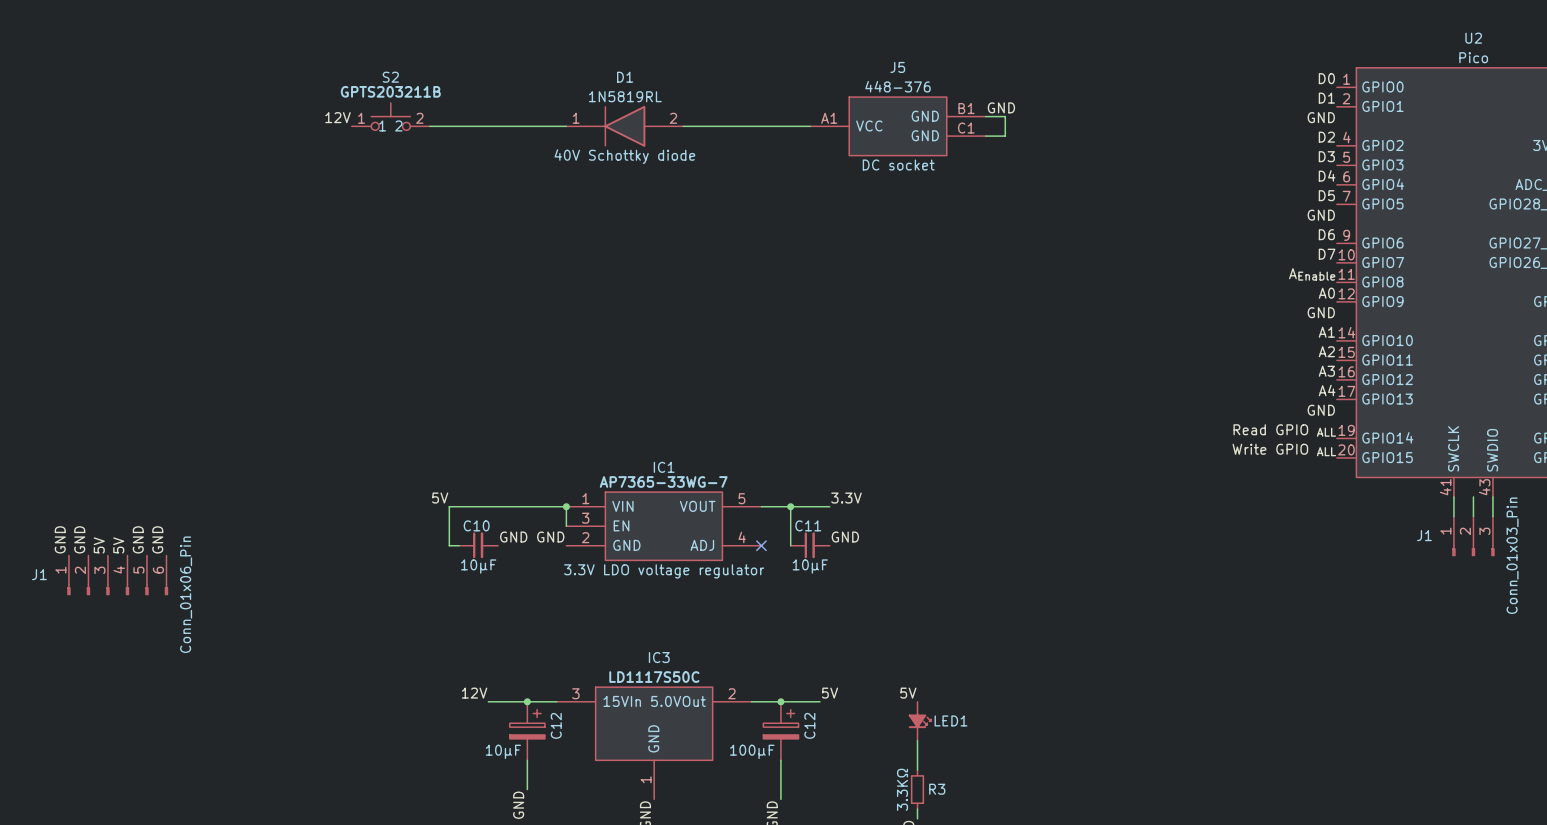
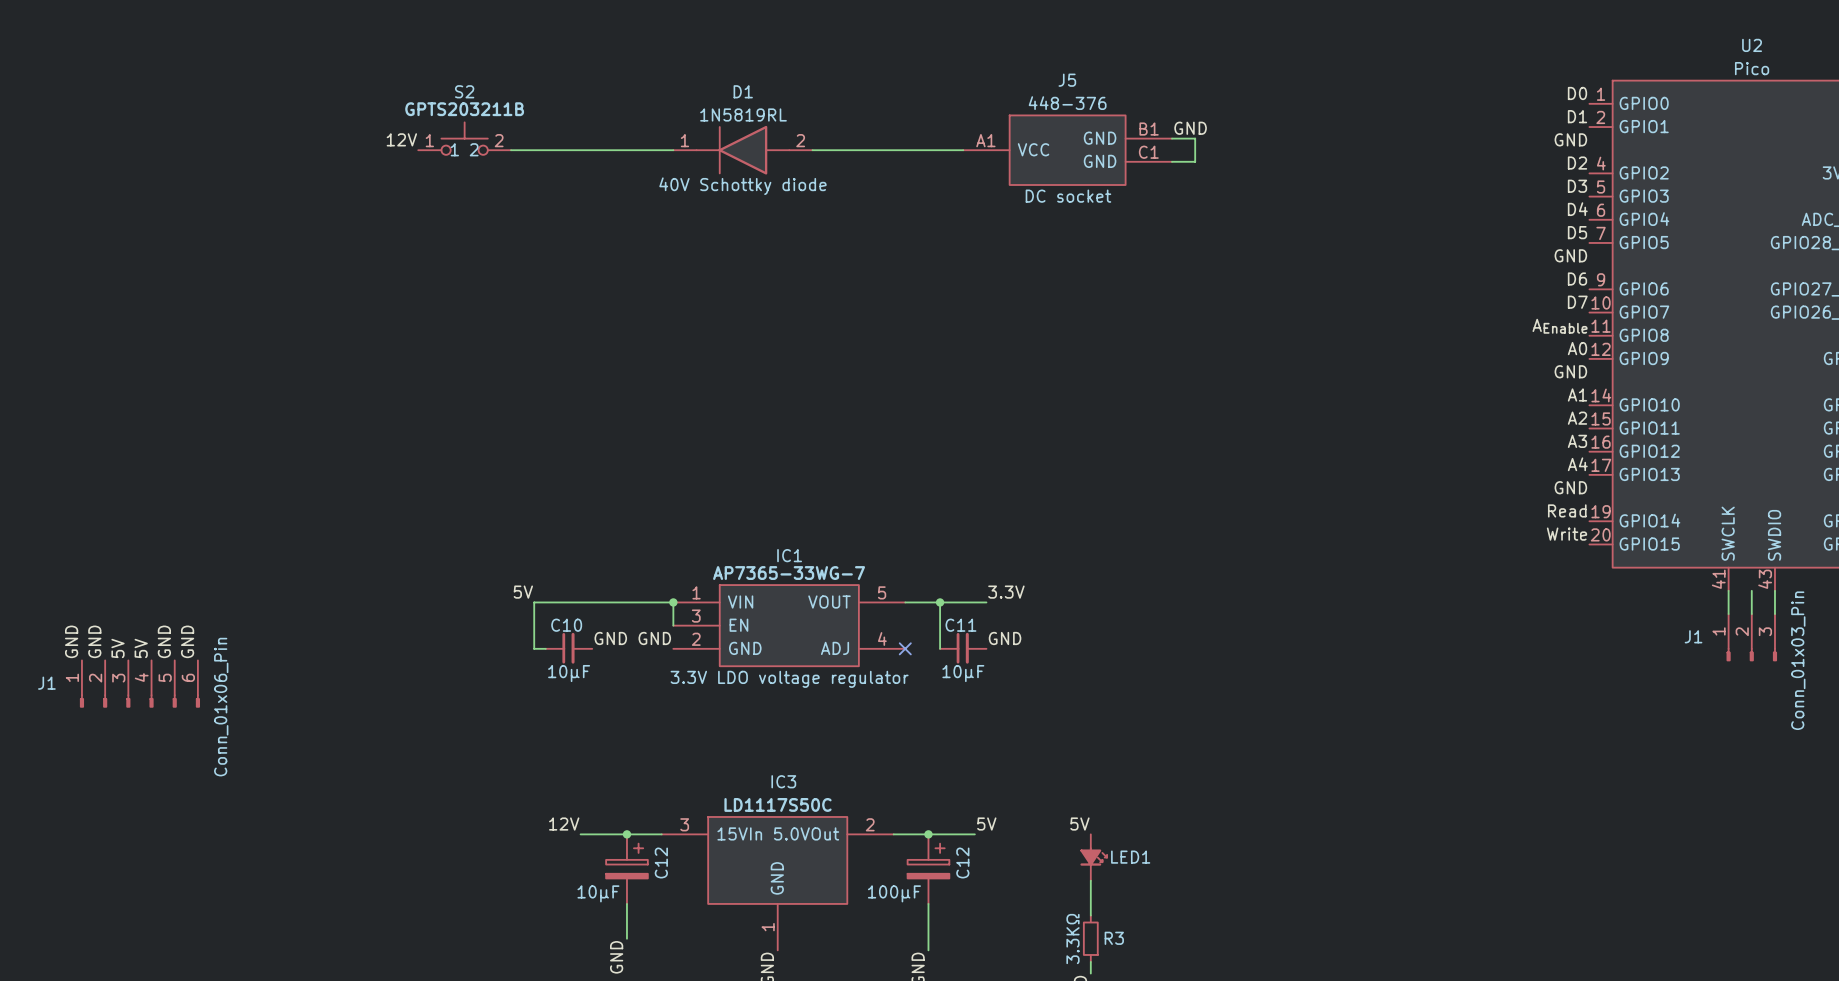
label: Read GPIO ALL (1284, 430) -> Read (1567, 510)
label: Write GPIO ALL (1284, 449) -> Write (1566, 534)

